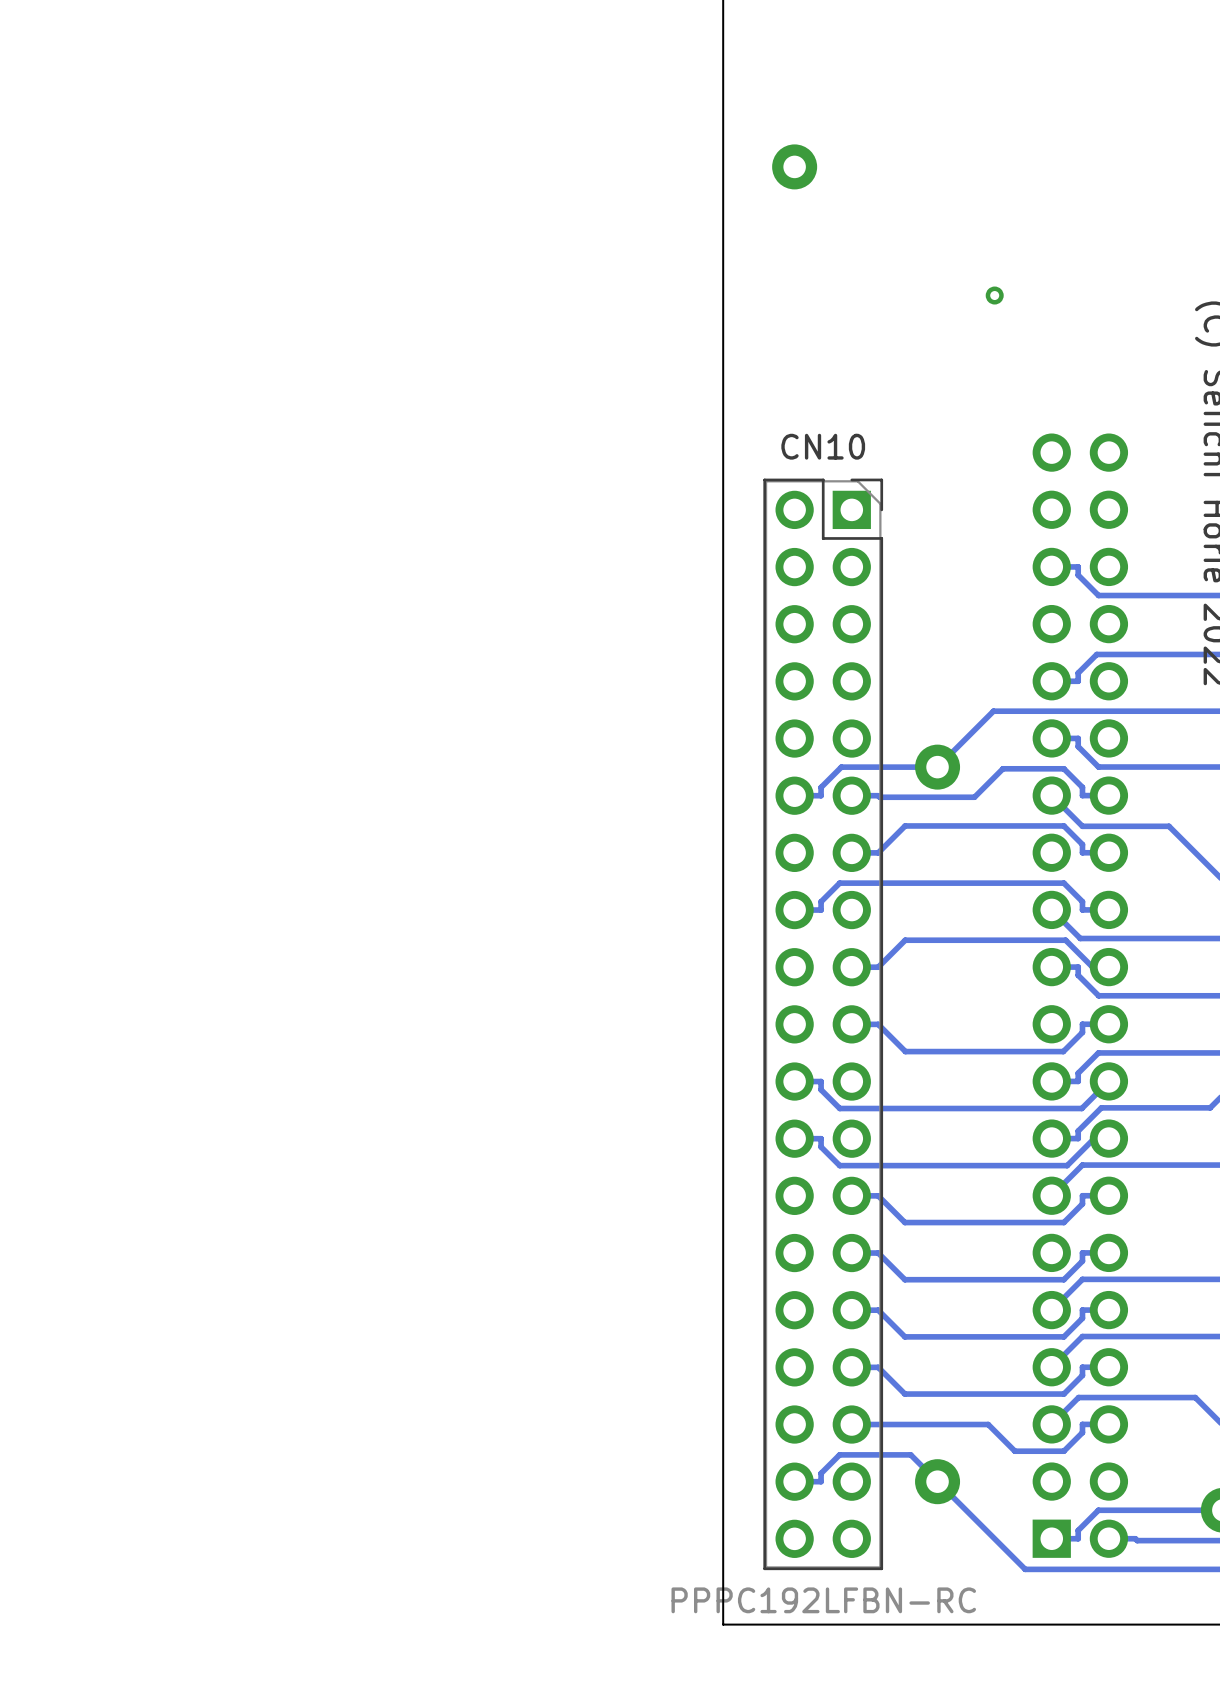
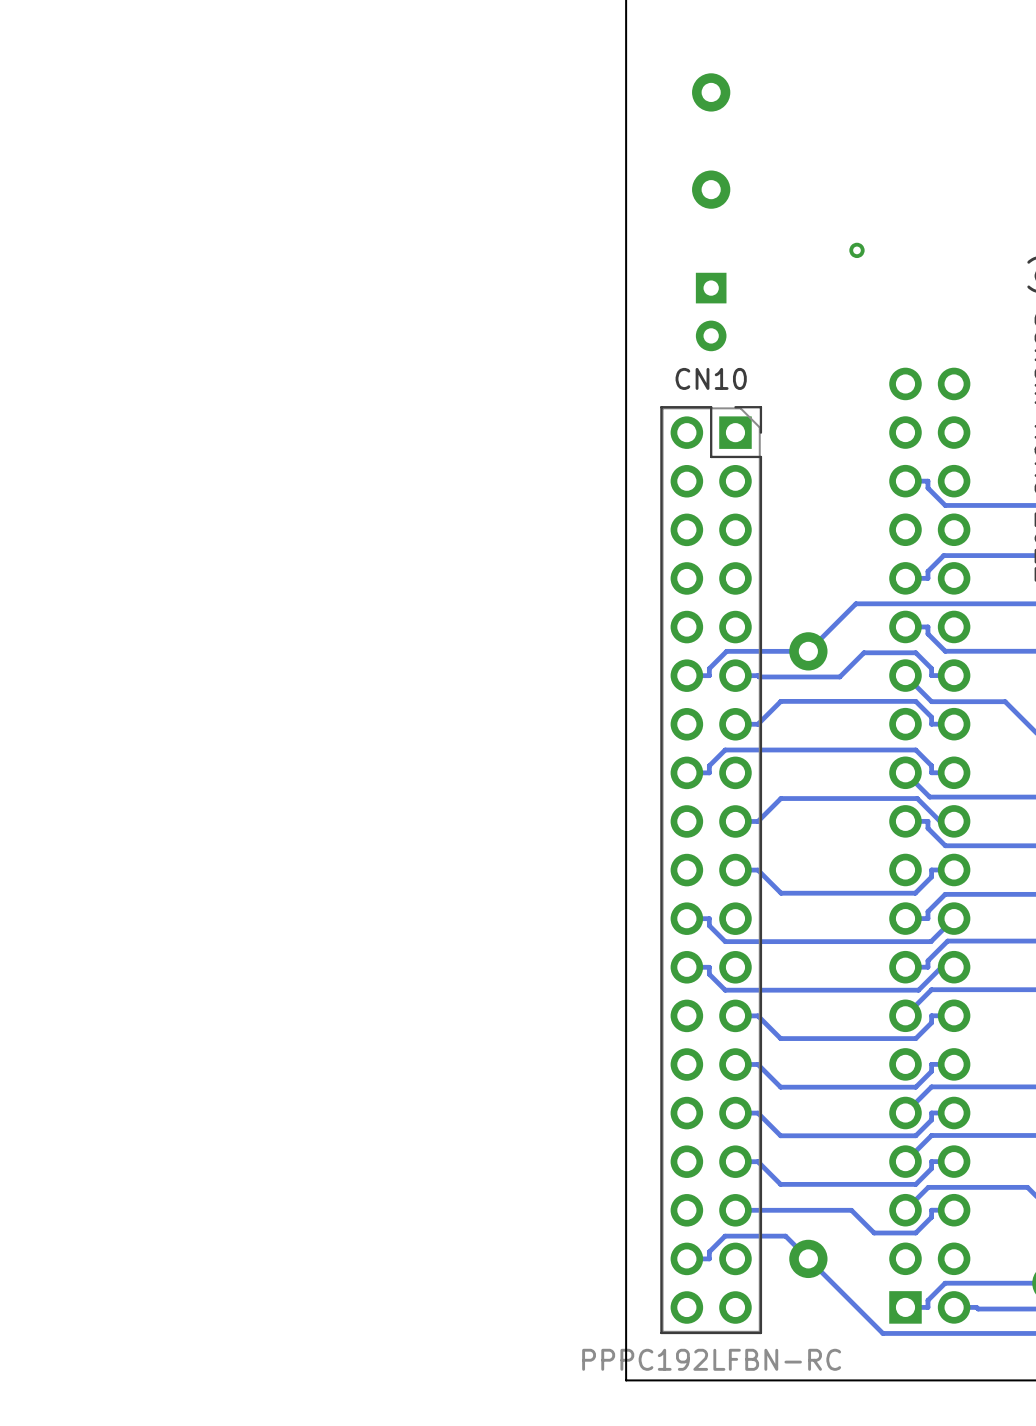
part: none -> (711, 92)
part: (794, 166) -> none
part: none -> (711, 189)
part: none -> (711, 312)

